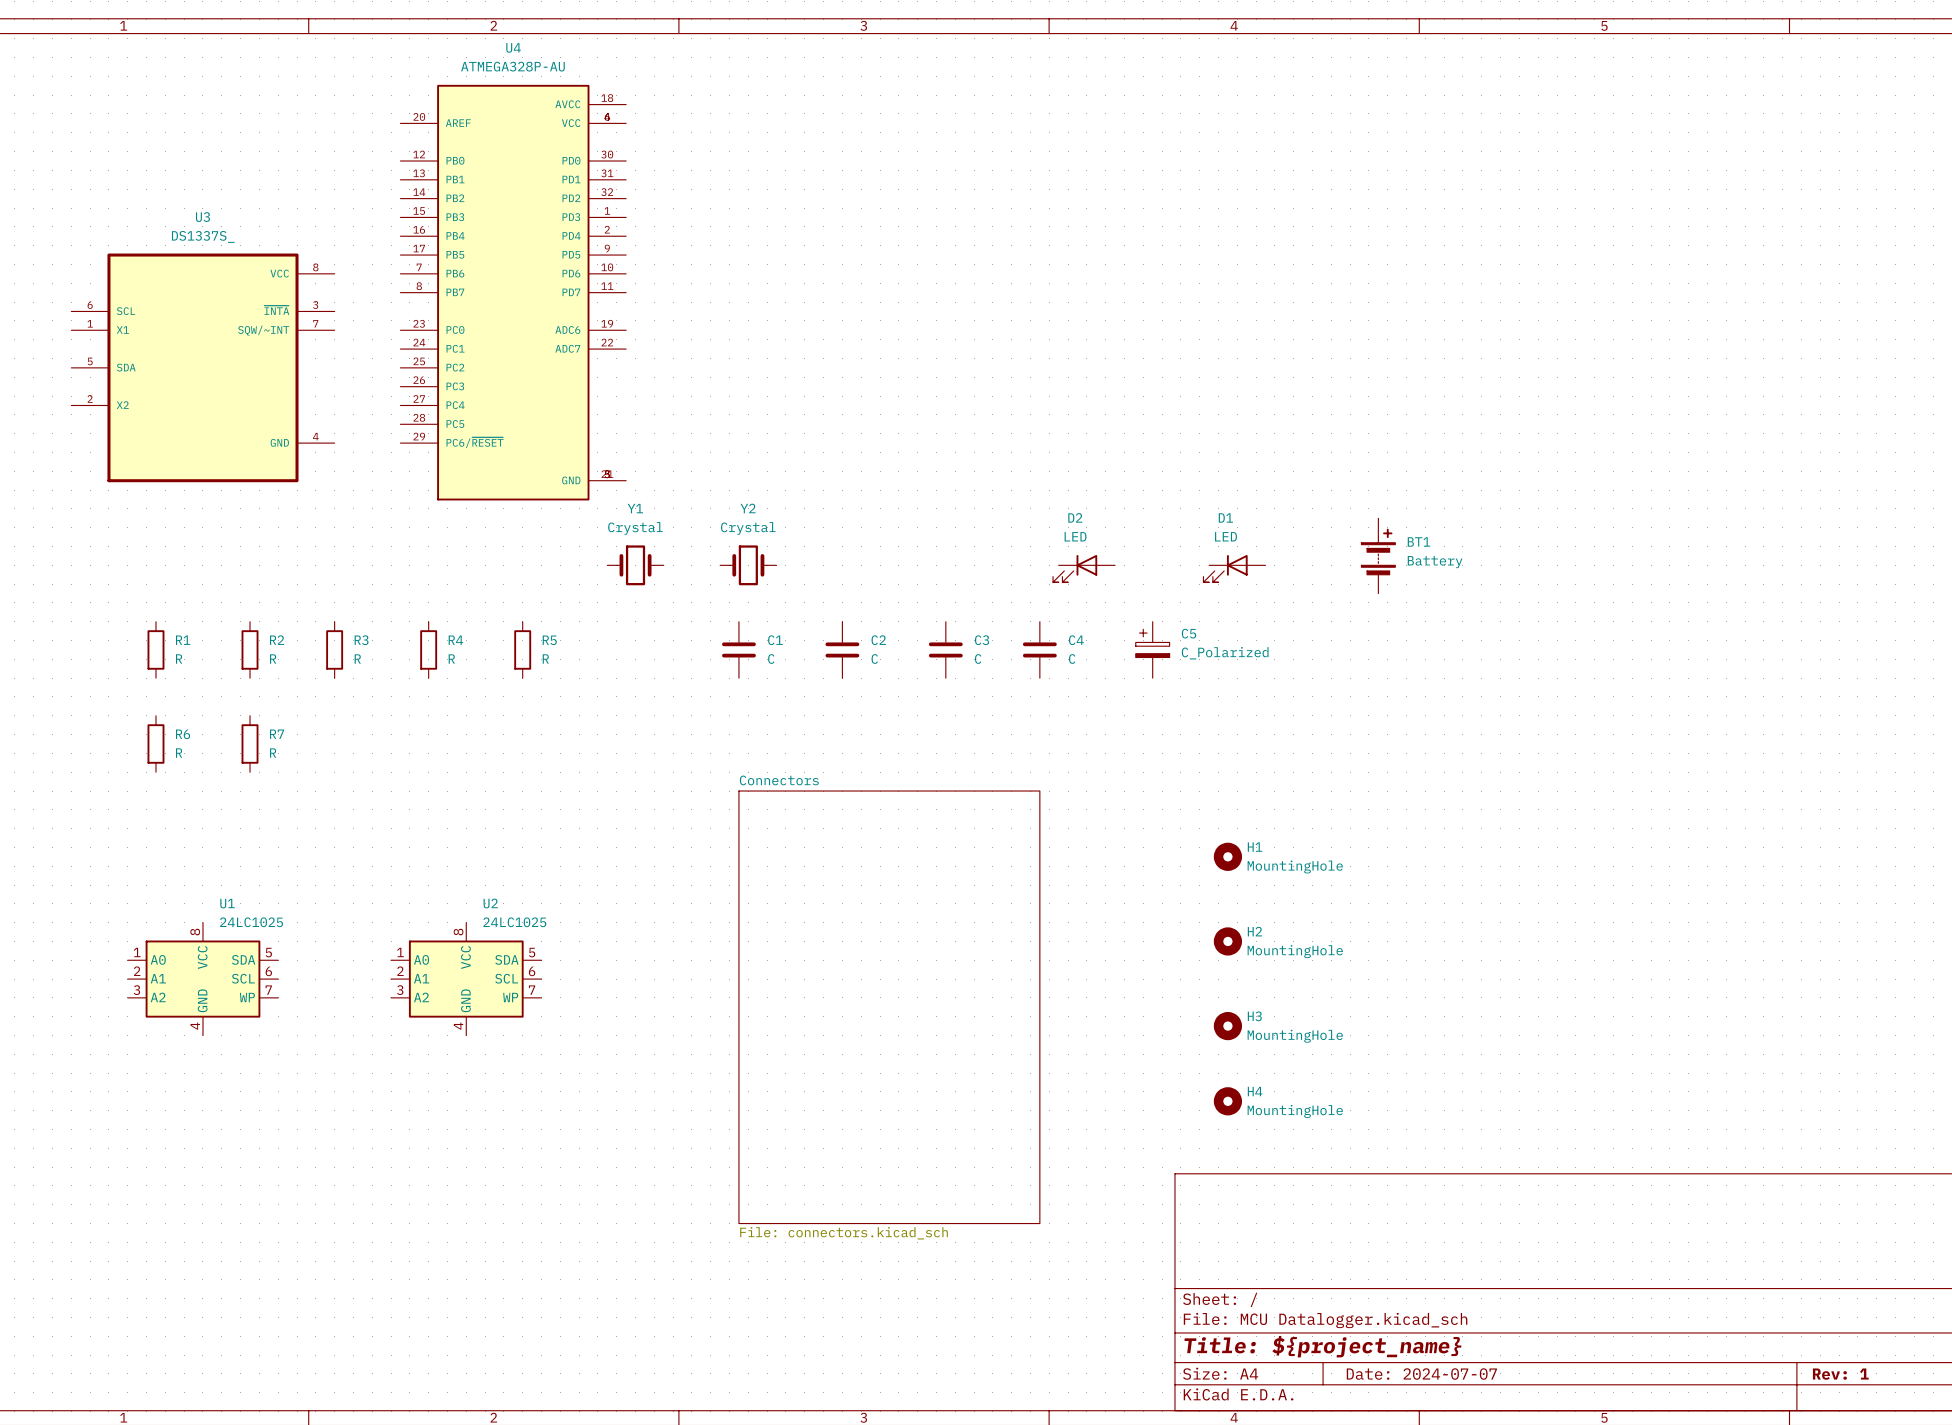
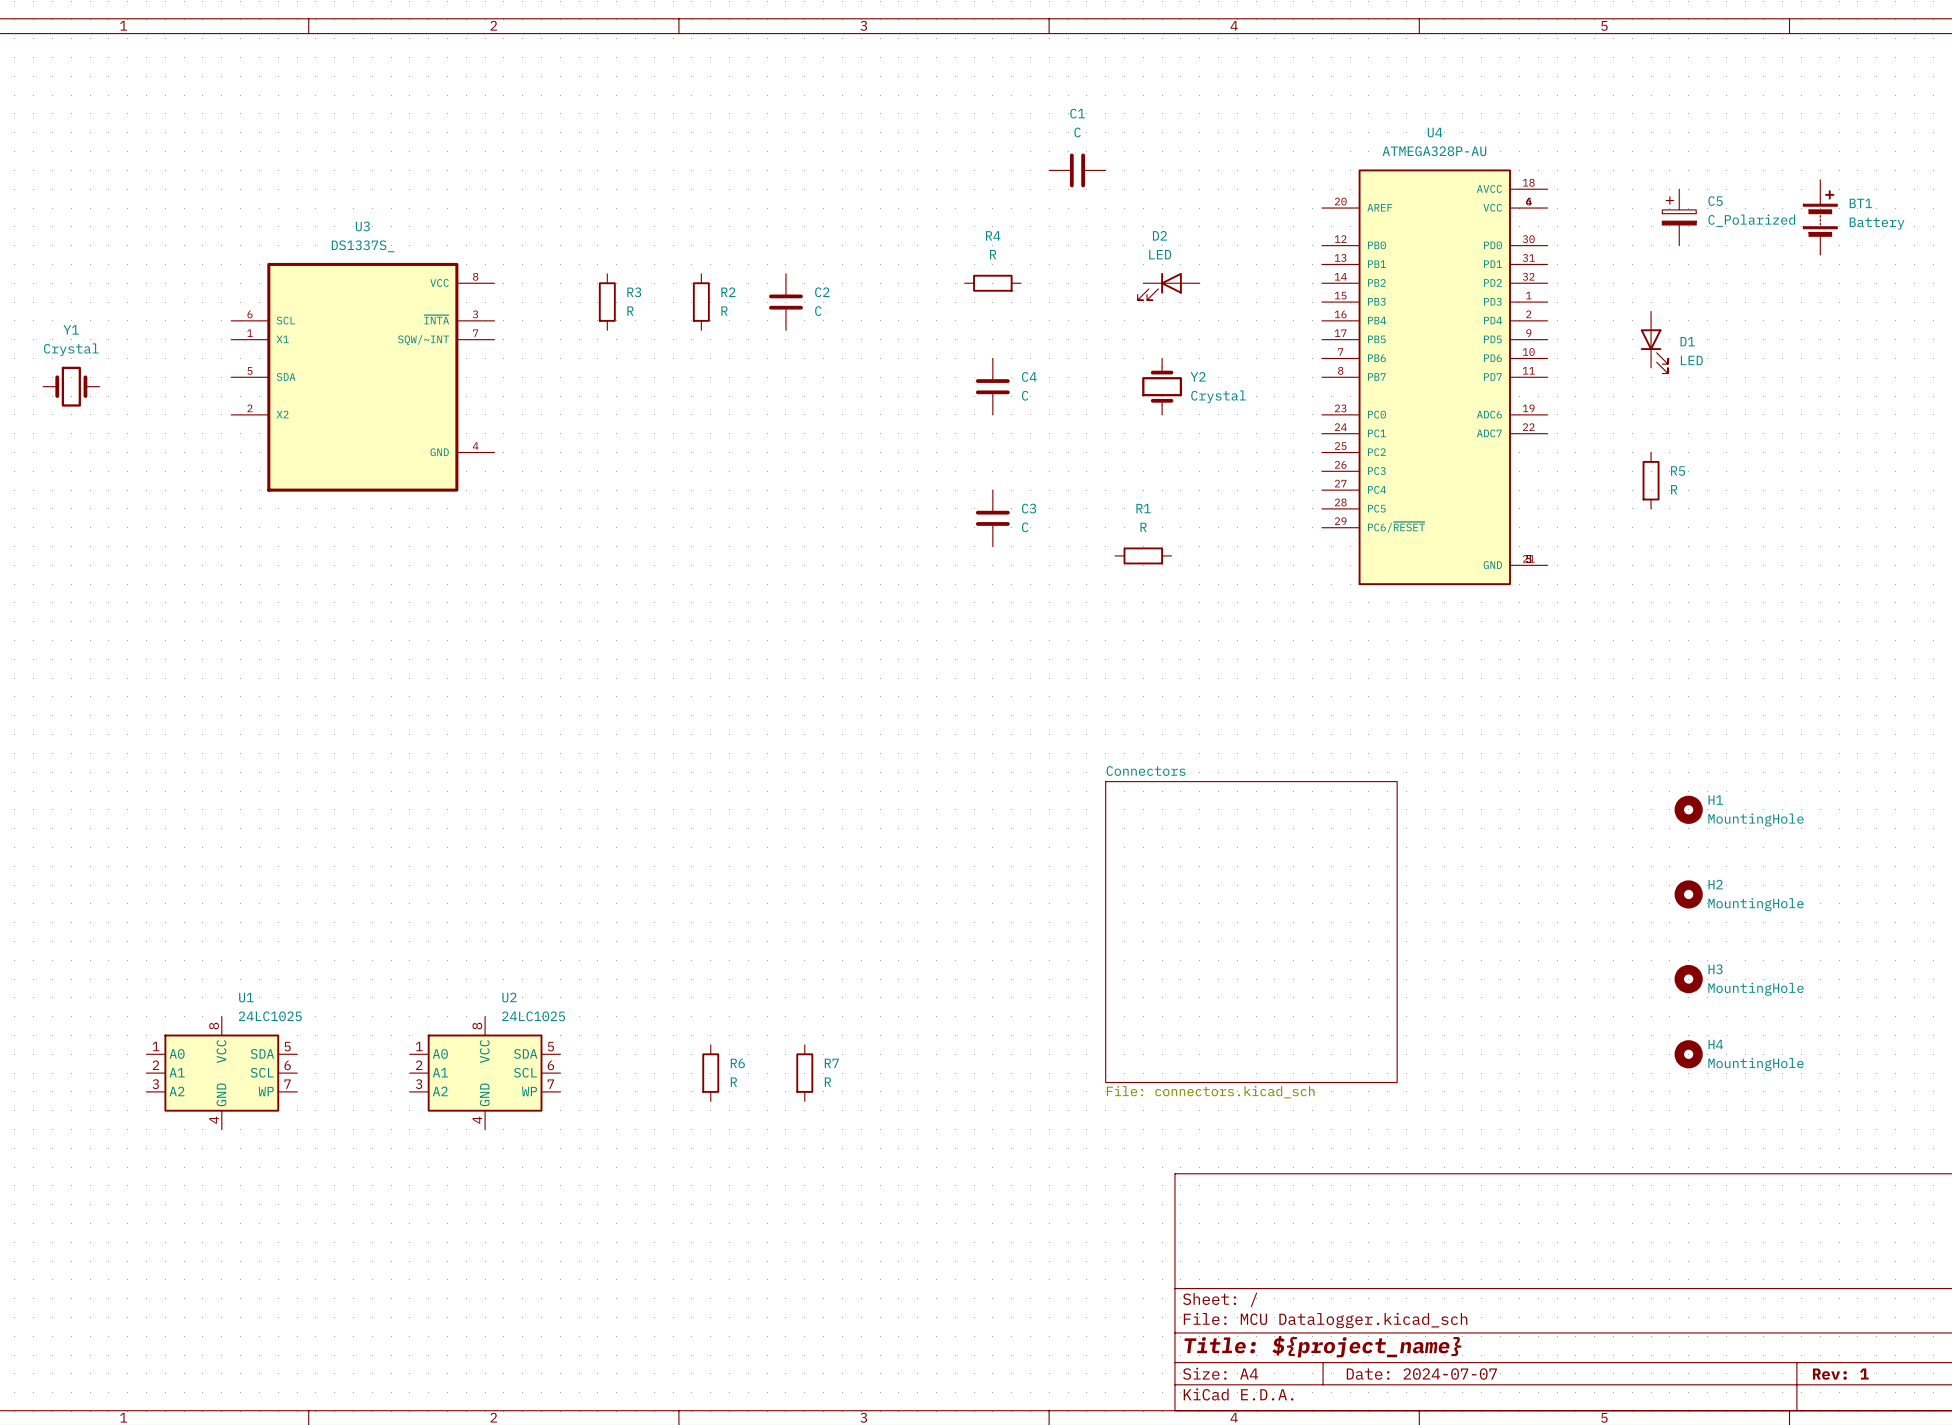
U4 position: (513, 292) -> (1434, 377)
U3 position: (202, 367) -> (362, 377)
Y2 name position: Y2 (748, 508) -> Y2 (1198, 376)
D1 name position: D1 (1225, 517) -> D1 (1687, 341)
Y2 value position: Crystal (748, 528) -> Crystal (1218, 396)
D1 value position: LED (1226, 536) -> LED (1691, 360)
BT1 position: (1378, 555) -> (1820, 217)
Y1 position: (635, 565) -> (71, 386)
Y2 rotation: 0° (748, 565) -> 90° clockwise (1162, 386)
Y2 position: (748, 565) -> (1162, 386)
D2 position: (1084, 568) -> (1168, 286)
D1 rotation: 0° (1225, 568) -> 90° counterclockwise (1654, 351)
D1 position: (1234, 568) -> (1654, 342)
R1 name position: R1 (183, 640) -> R1 (1143, 508)
R4 name position: R4 (455, 640) -> R4 (993, 235)
C1 name position: C1 (775, 640) -> C1 (1077, 113)
R1 rotation: 0° (155, 649) -> 90° clockwise (1143, 555)
R1 position: (155, 649) -> (1143, 555)
R2 position: (250, 649) -> (701, 302)
R3 position: (334, 649) -> (607, 302)
R4 rotation: 0° (428, 649) -> 90° clockwise (992, 283)
R4 position: (428, 649) -> (992, 283)
R5 position: (522, 649) -> (1651, 480)
C1 rotation: 0° (738, 649) -> 90° clockwise (1077, 170)
C1 position: (738, 649) -> (1077, 170)
C2 position: (842, 649) -> (785, 302)
C3 position: (945, 649) -> (992, 518)
C4 position: (1039, 649) -> (992, 386)
C5 position: (1152, 649) -> (1679, 217)
R1 value position: R (179, 659) -> R (1143, 527)
R4 value position: R (451, 659) -> R (993, 254)
C1 value position: C (771, 659) -> C (1077, 132)
R6 position: (155, 743) -> (710, 1073)
R7 position: (250, 743) -> (804, 1073)
H1 position: (1227, 856) -> (1688, 809)
sheet Connectors: none -> File: connectors.kicad_sch (1251, 932)
H2 position: (1227, 941) -> (1688, 894)
U1 position: (202, 979) -> (221, 1073)
U2 position: (466, 979) -> (485, 1073)
sheet Connectors: File: connectors.kicad_sch (889, 1007) -> none
H3 position: (1227, 1026) -> (1688, 979)
H4 position: (1227, 1101) -> (1688, 1054)

